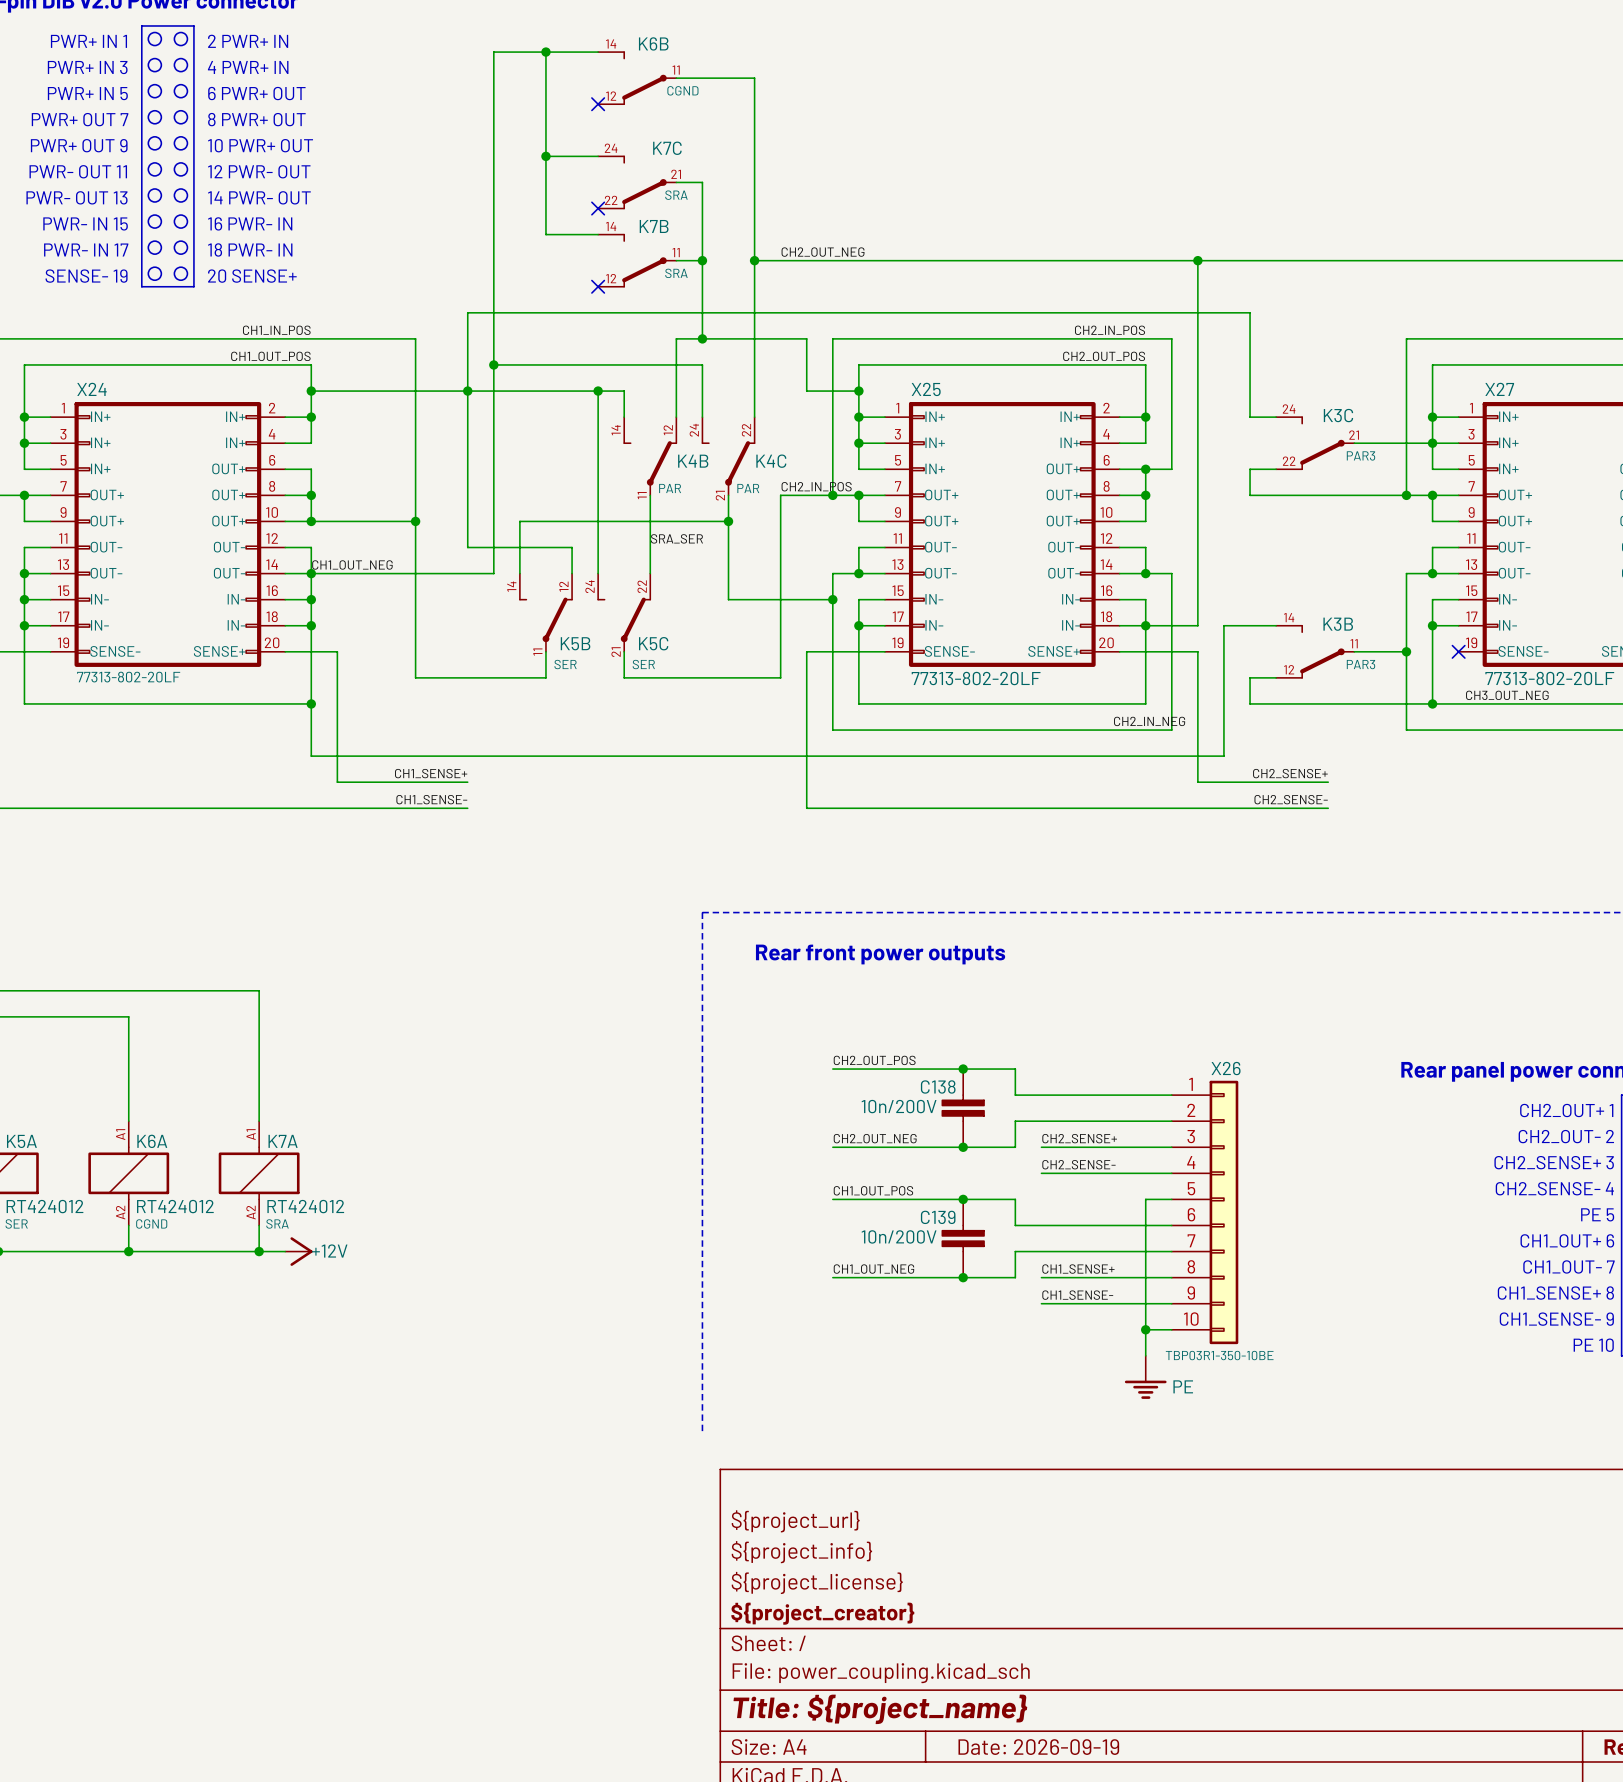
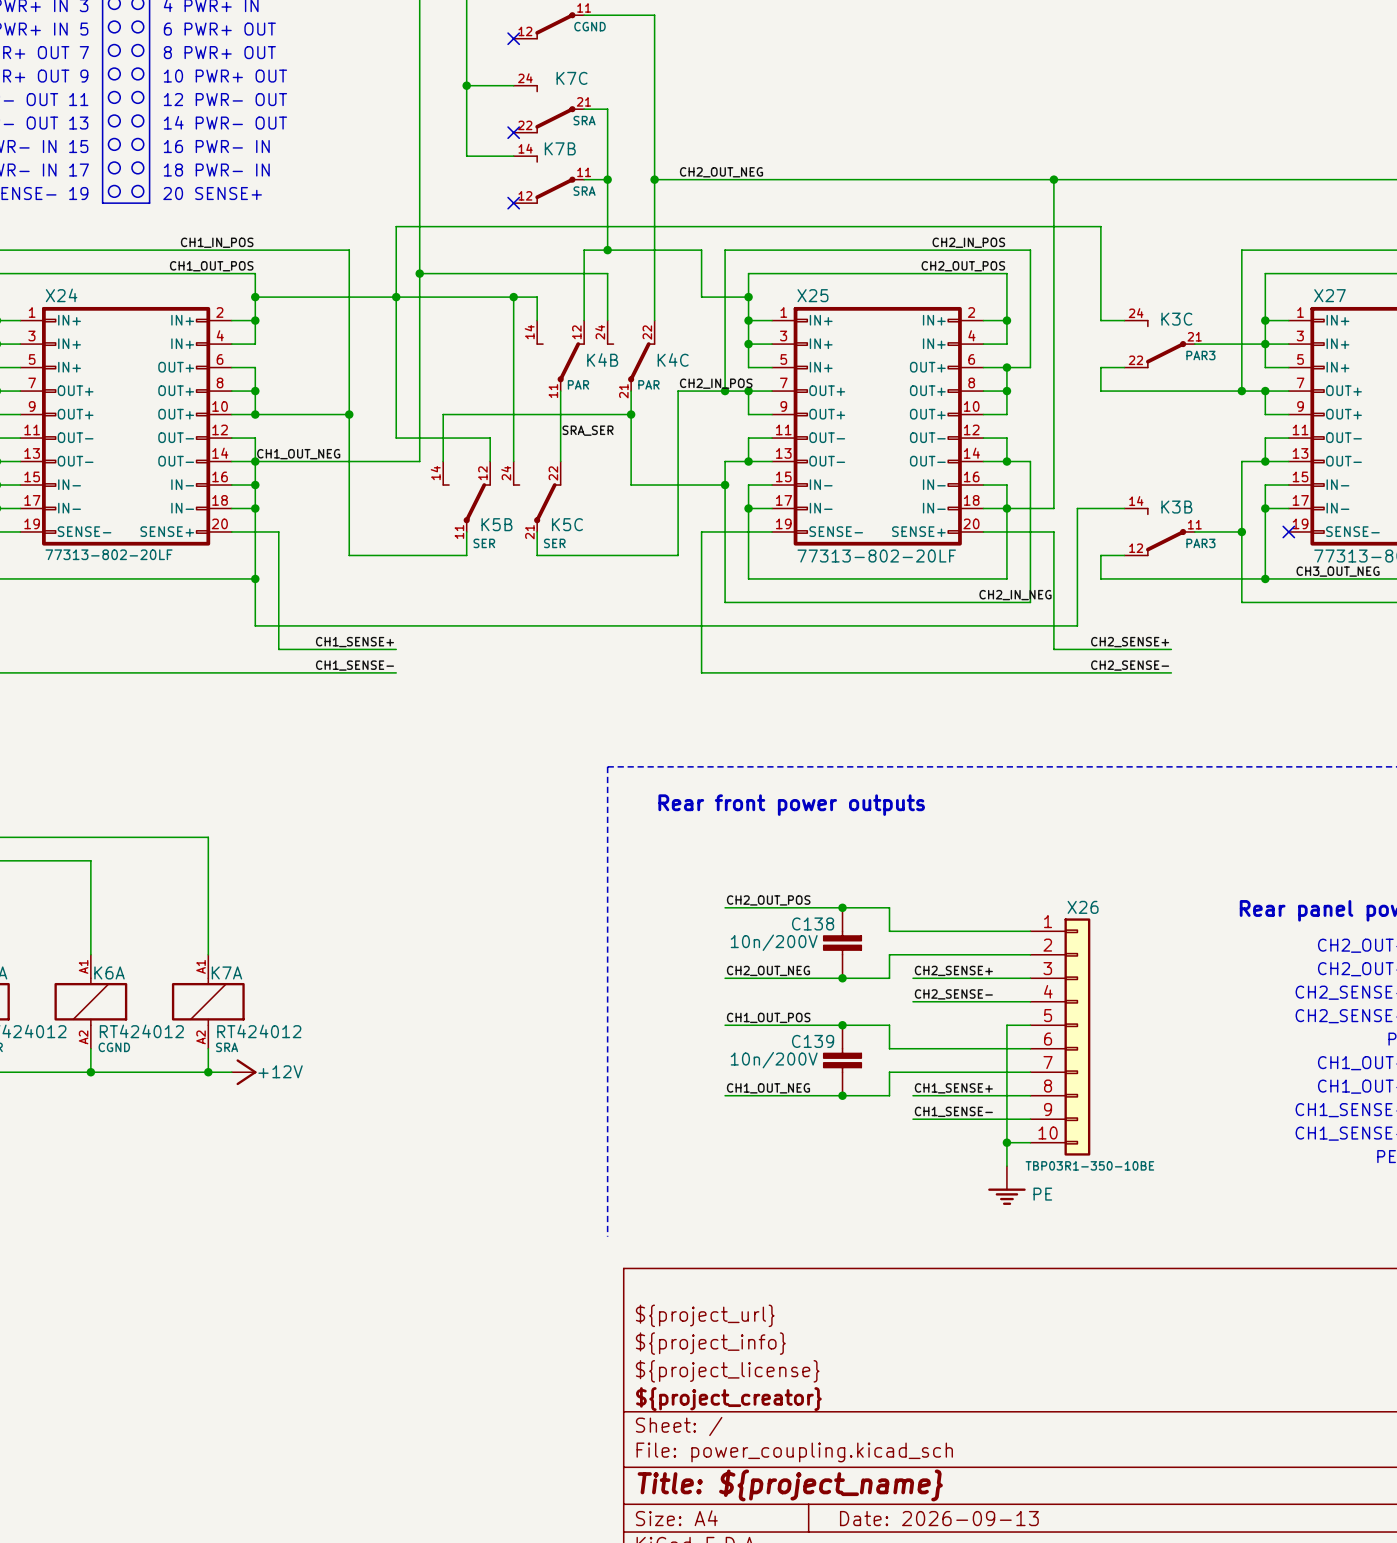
title block: Date: 2026-09-19 (1038, 1747) -> Date: 2026-09-13 (939, 1518)

